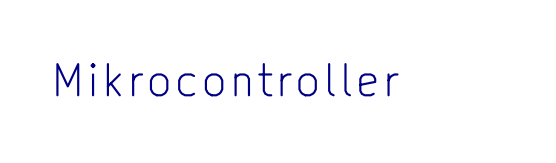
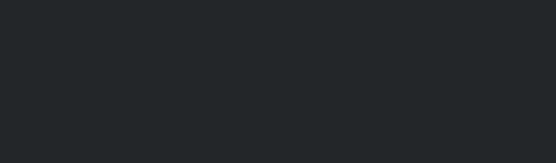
text: Mikrocontroller (227, 79) -> none

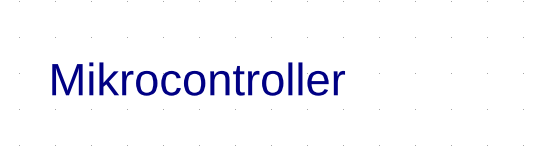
text: none -> Mikrocontroller (198, 79)

